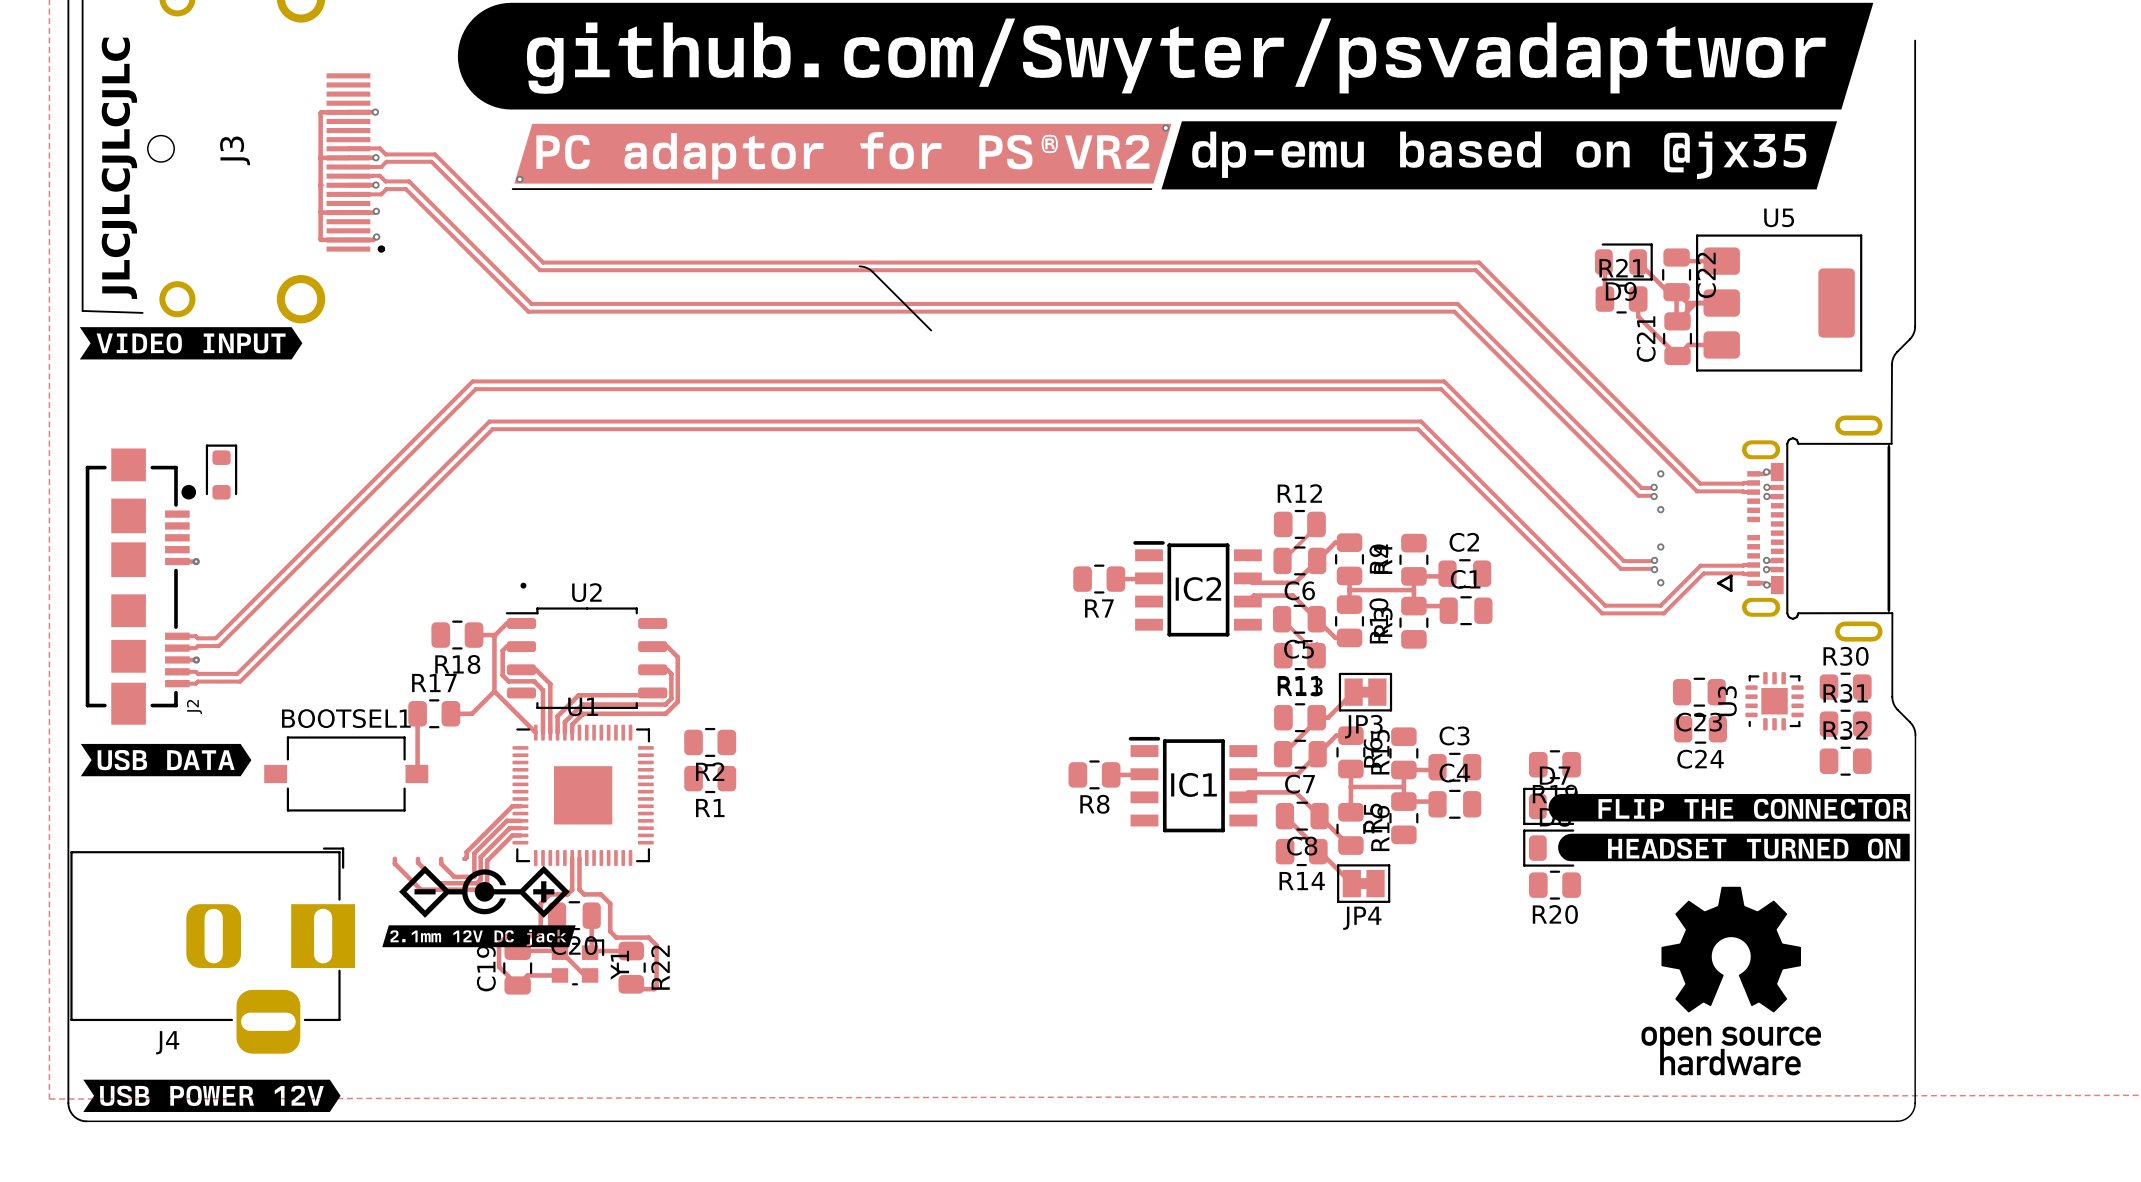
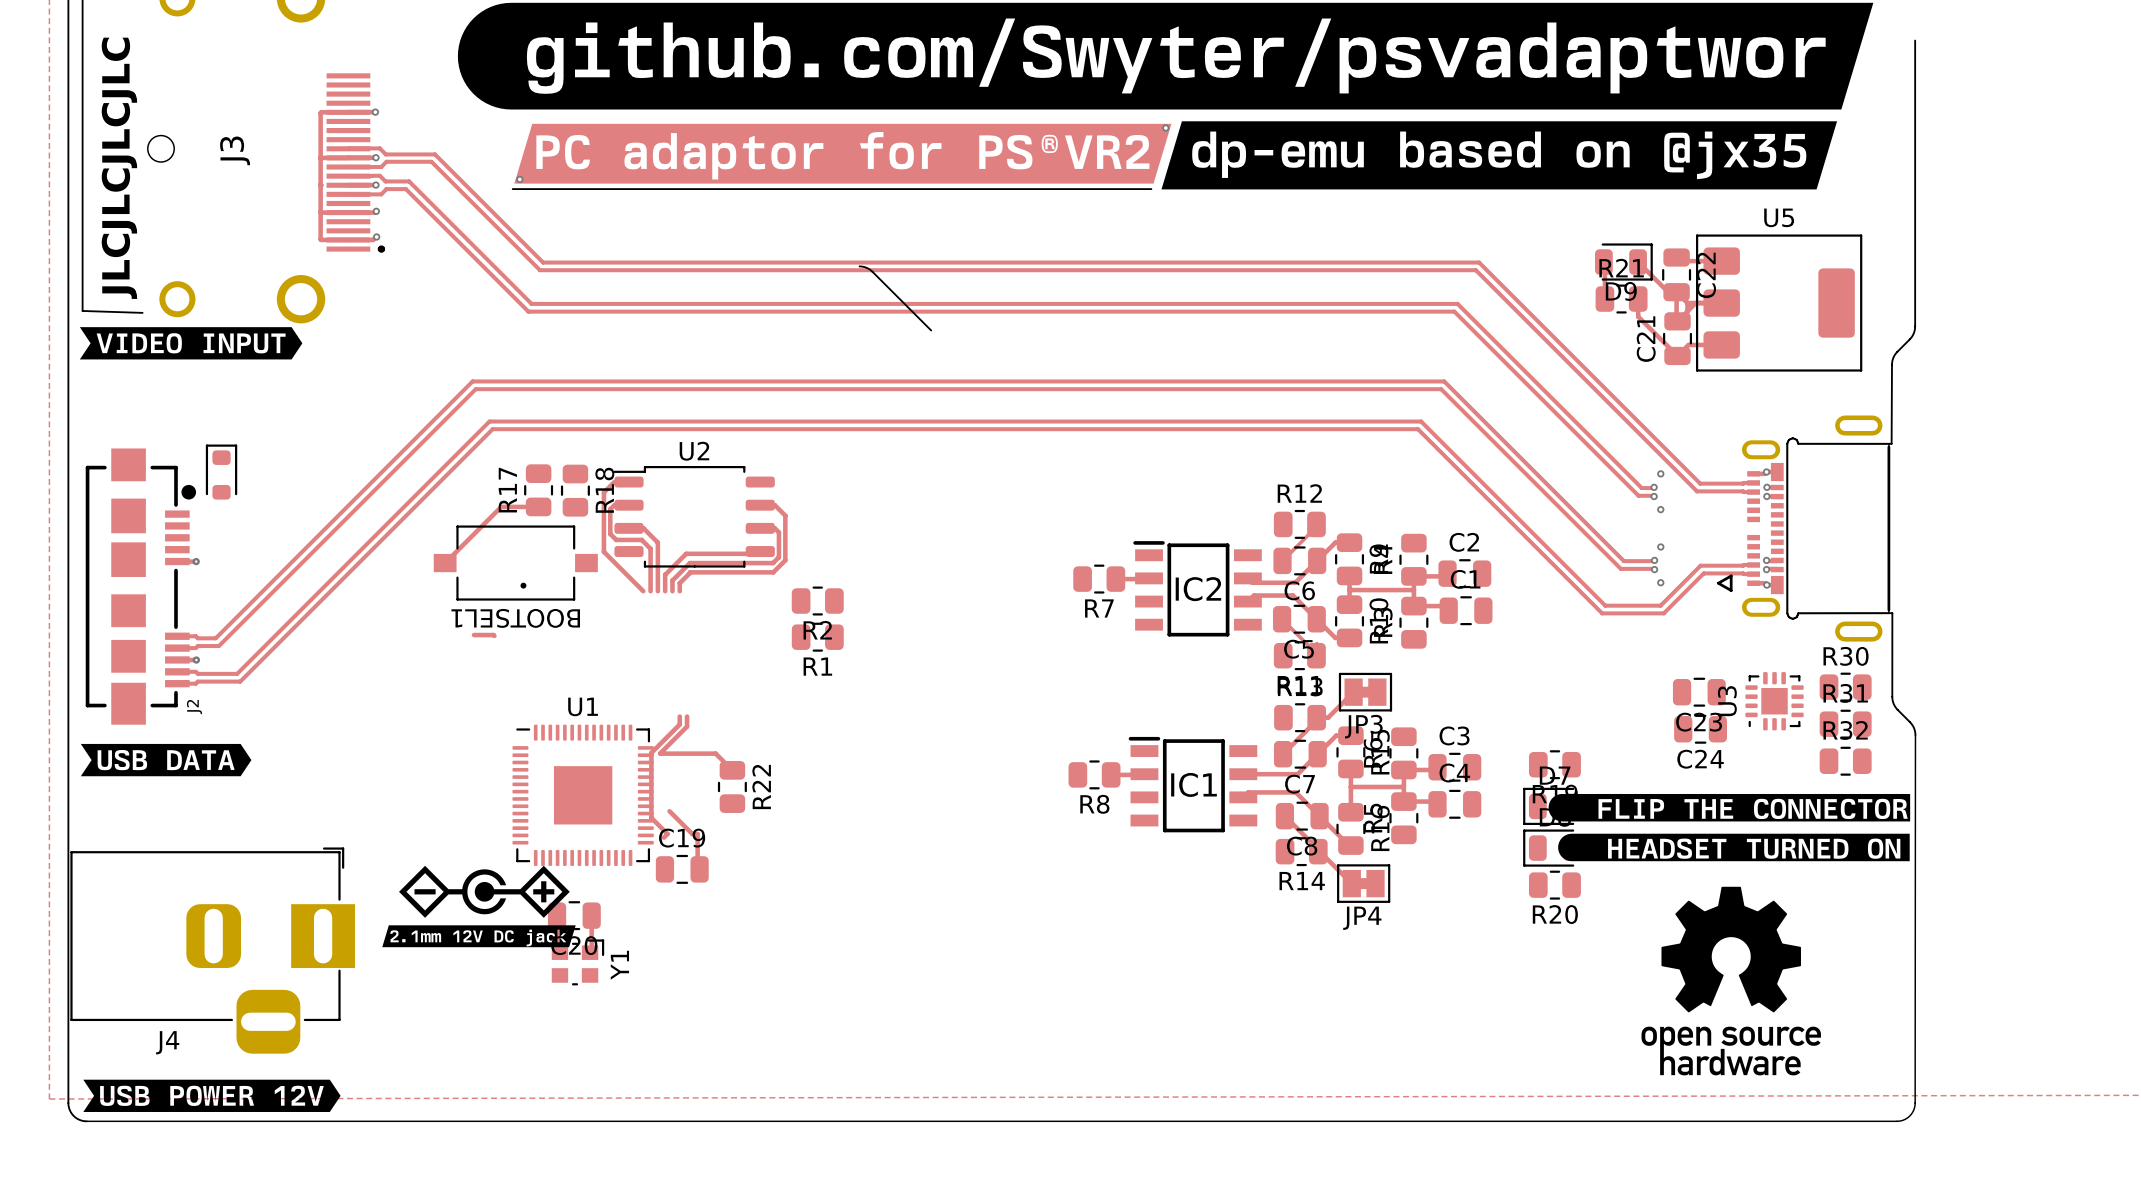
track: none -> (614, 482) (603, 492) (603, 551) (643, 591)
track: none -> (538, 506) (501, 506) (445, 563)
track: (521, 623) (506, 623) (494, 635) (494, 691) -> none
R18 rotation: 0° (457, 635) -> 90° clockwise (575, 490)
R18 position: (457, 635) -> (575, 490)
track: (521, 646) (506, 646) (502, 650) (502, 675) (508, 681) (534, 681) (543, 690) (543, 732) -> (628, 505) (614, 505) (610, 509) (610, 534) (616, 539) (641, 539) (650, 548) (650, 591)
track: (652, 646) (667, 646) (677, 657) (677, 701) (665, 713) (582, 713) (572, 724) (572, 732) -> (760, 505) (774, 505) (785, 515) (785, 560) (773, 572) (690, 572) (679, 583) (679, 591)
U2 position: (586, 658) -> (694, 516)
R18 name position: R18 (457, 664) -> R18 (604, 490)
track: (521, 669) (536, 669) (550, 684) (550, 732) -> (628, 528) (643, 528) (657, 542) (657, 591)
track: (652, 669) (667, 669) (671, 673) (671, 698) (665, 704) (582, 704) (564, 722) (564, 732) -> (760, 528) (774, 528) (778, 532) (778, 557) (773, 563) (690, 563) (672, 580) (672, 591)
R17 name position: R17 (434, 683) -> R17 (507, 490)
track: (494, 691) (535, 732) -> none
track: (494, 691) (472, 713) (450, 713) -> none
track: (652, 692) (651, 695) (578, 695) (557, 716) (557, 732) -> (760, 551) (759, 553) (686, 553) (665, 574) (665, 591)
track: (417, 713) (416, 773) -> none
R17 rotation: 0° (434, 713) -> 90° clockwise (538, 490)
R17 position: (434, 713) -> (538, 490)
track: none -> (679, 716) (679, 724) (651, 752) (651, 817) (667, 834) (663, 837)
track: none -> (687, 716) (687, 726) (660, 753)
BOOTSEL1 name rotation: 0° (346, 718) -> 180° (515, 618)
R2 position: (710, 742) -> (817, 601)
track: none -> (660, 753) (715, 753) (732, 770)
BOOTSEL1 position: (346, 773) -> (515, 563)
R1 position: (710, 778) -> (817, 637)
track: (520, 806) (512, 806) (466, 852) (466, 857) (464, 858) -> none
track: none -> (669, 811) (692, 834) (697, 834) (697, 867) (699, 869)
track: (520, 820) (506, 820) (474, 853) (474, 876) (454, 876) (441, 863) (441, 858) -> none
track: (520, 828) (509, 828) (480, 857) (480, 879) (477, 883) (438, 883) (418, 862) (418, 858) -> none
track: (520, 835) (512, 835) (487, 860) (487, 883) (480, 889) (420, 889) (394, 863) (394, 858) -> none
track: (572, 857) (572, 889) (567, 894) (550, 894) (540, 903) (540, 931) (536, 936) (506, 936) (499, 943) (499, 966) (517, 985) (527, 975) (559, 975) (556, 979) -> none
track: (579, 857) (579, 889) (584, 894) (600, 894) (610, 903) (610, 931) (616, 937) (648, 937) (656, 945) (656, 987) (654, 989) (629, 989) (628, 987) -> none
track: (517, 950) (558, 950) -> none
track: (631, 951) (591, 951) (590, 952) -> none
track: (561, 952) (584, 975) (590, 975) -> none
R22 position: (631, 967) -> (732, 786)
C19 rotation: 0° (517, 968) -> 90° clockwise (682, 869)
C19 position: (517, 968) -> (682, 869)

